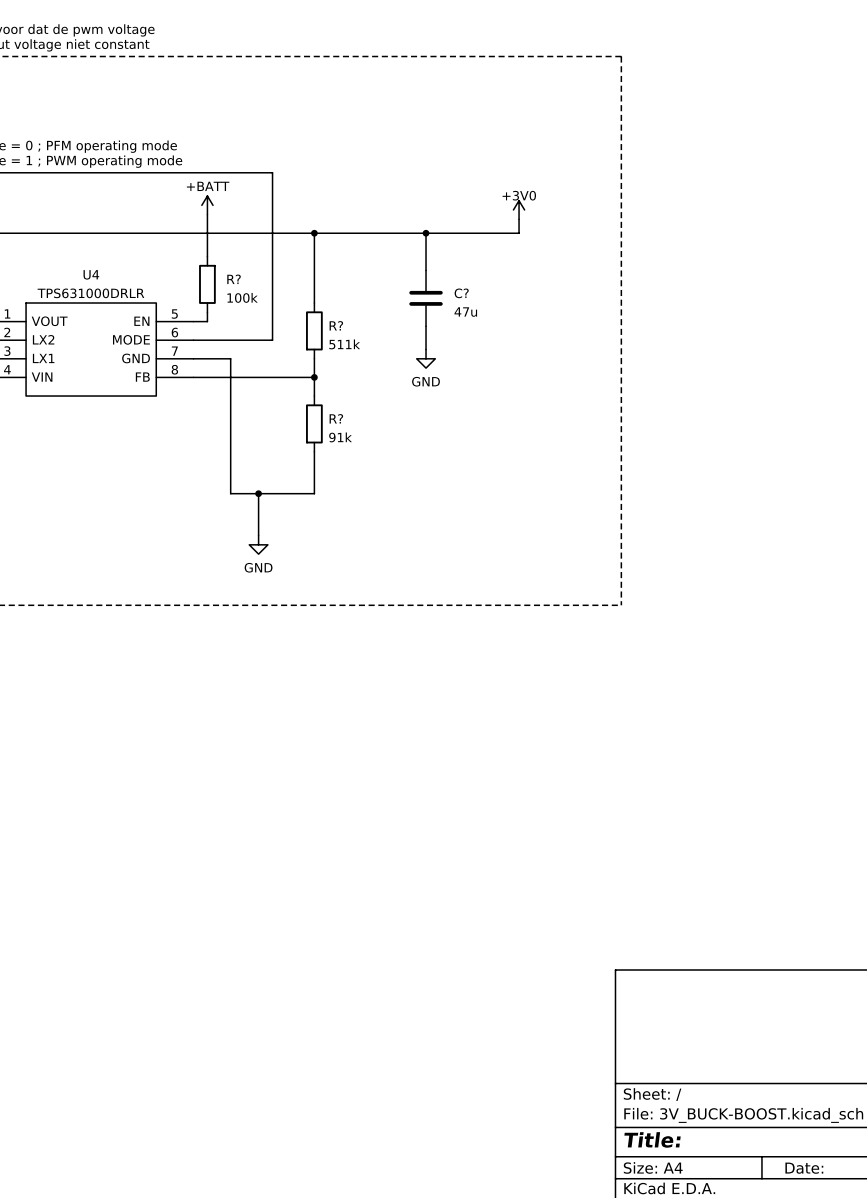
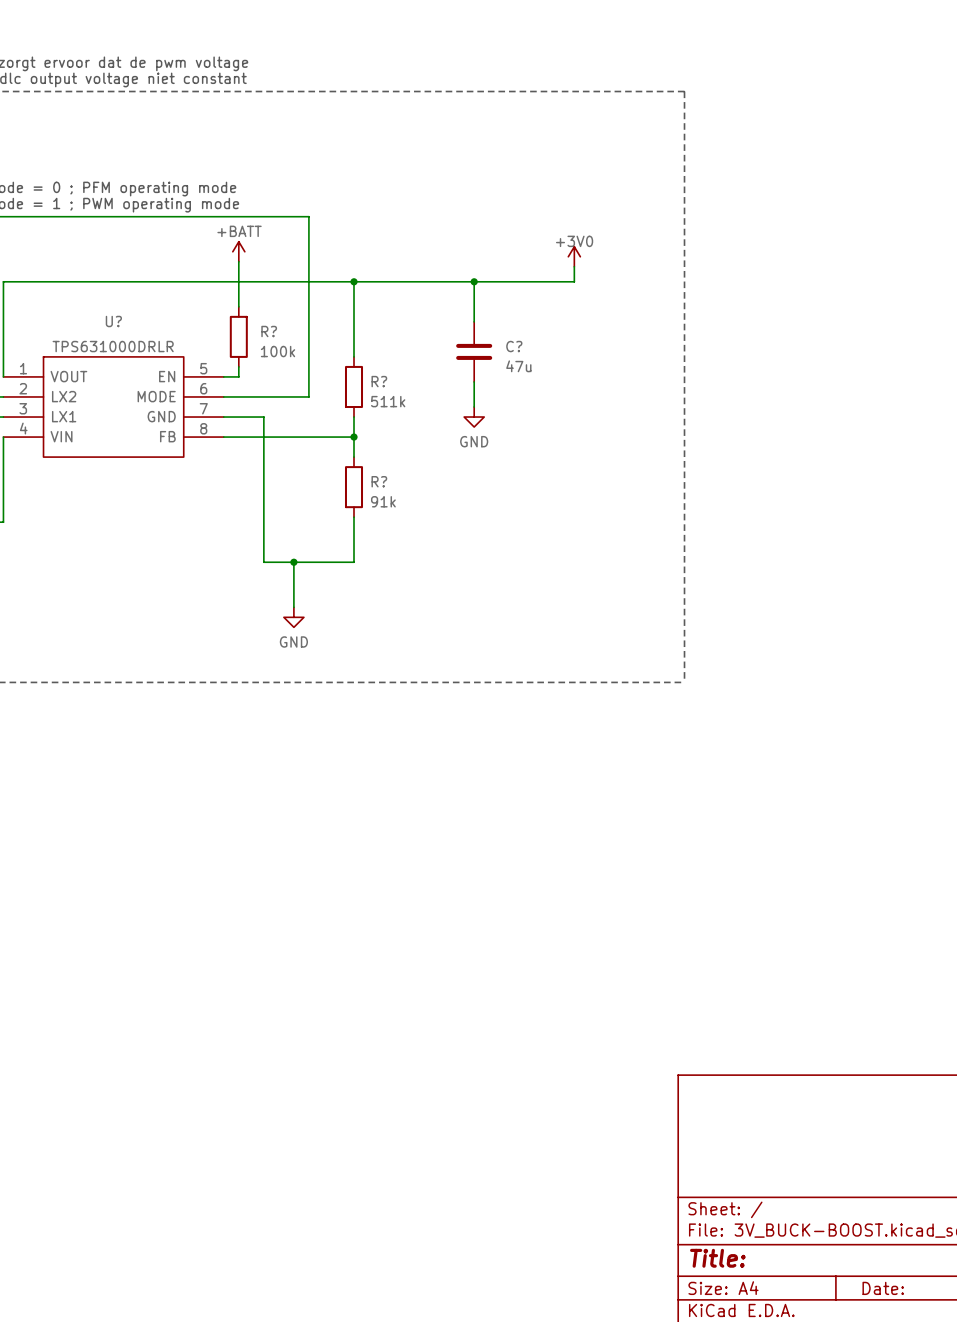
U4 name: U4 (91, 274) -> U? (113, 321)

